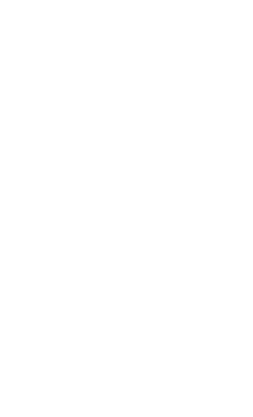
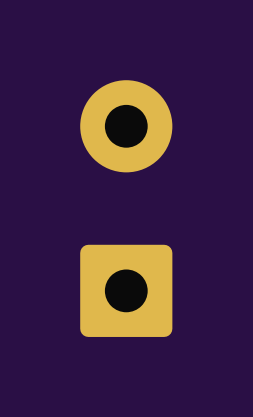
part: none -> (126, 208)

